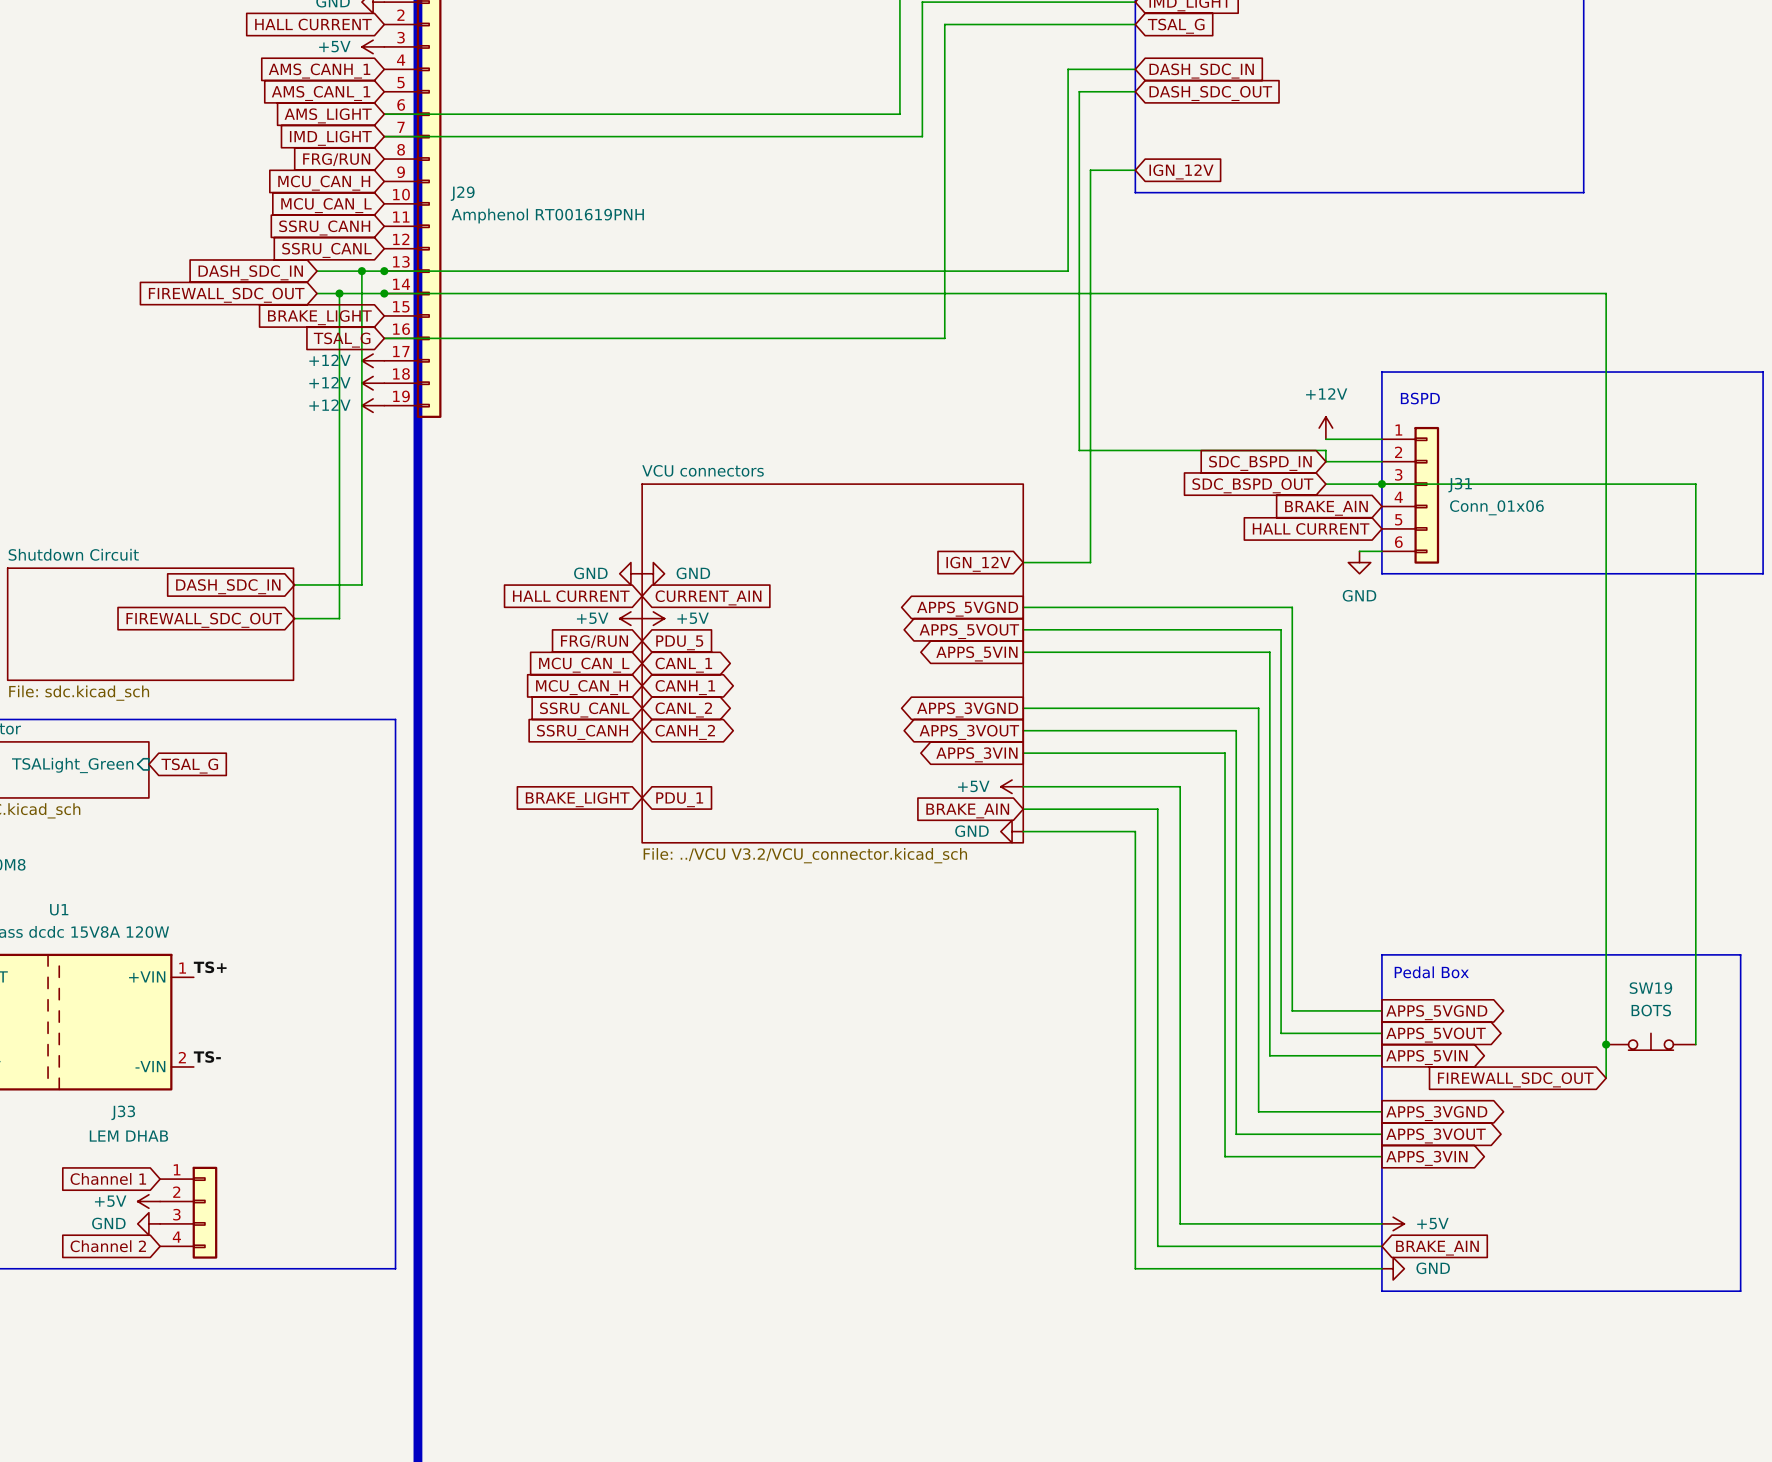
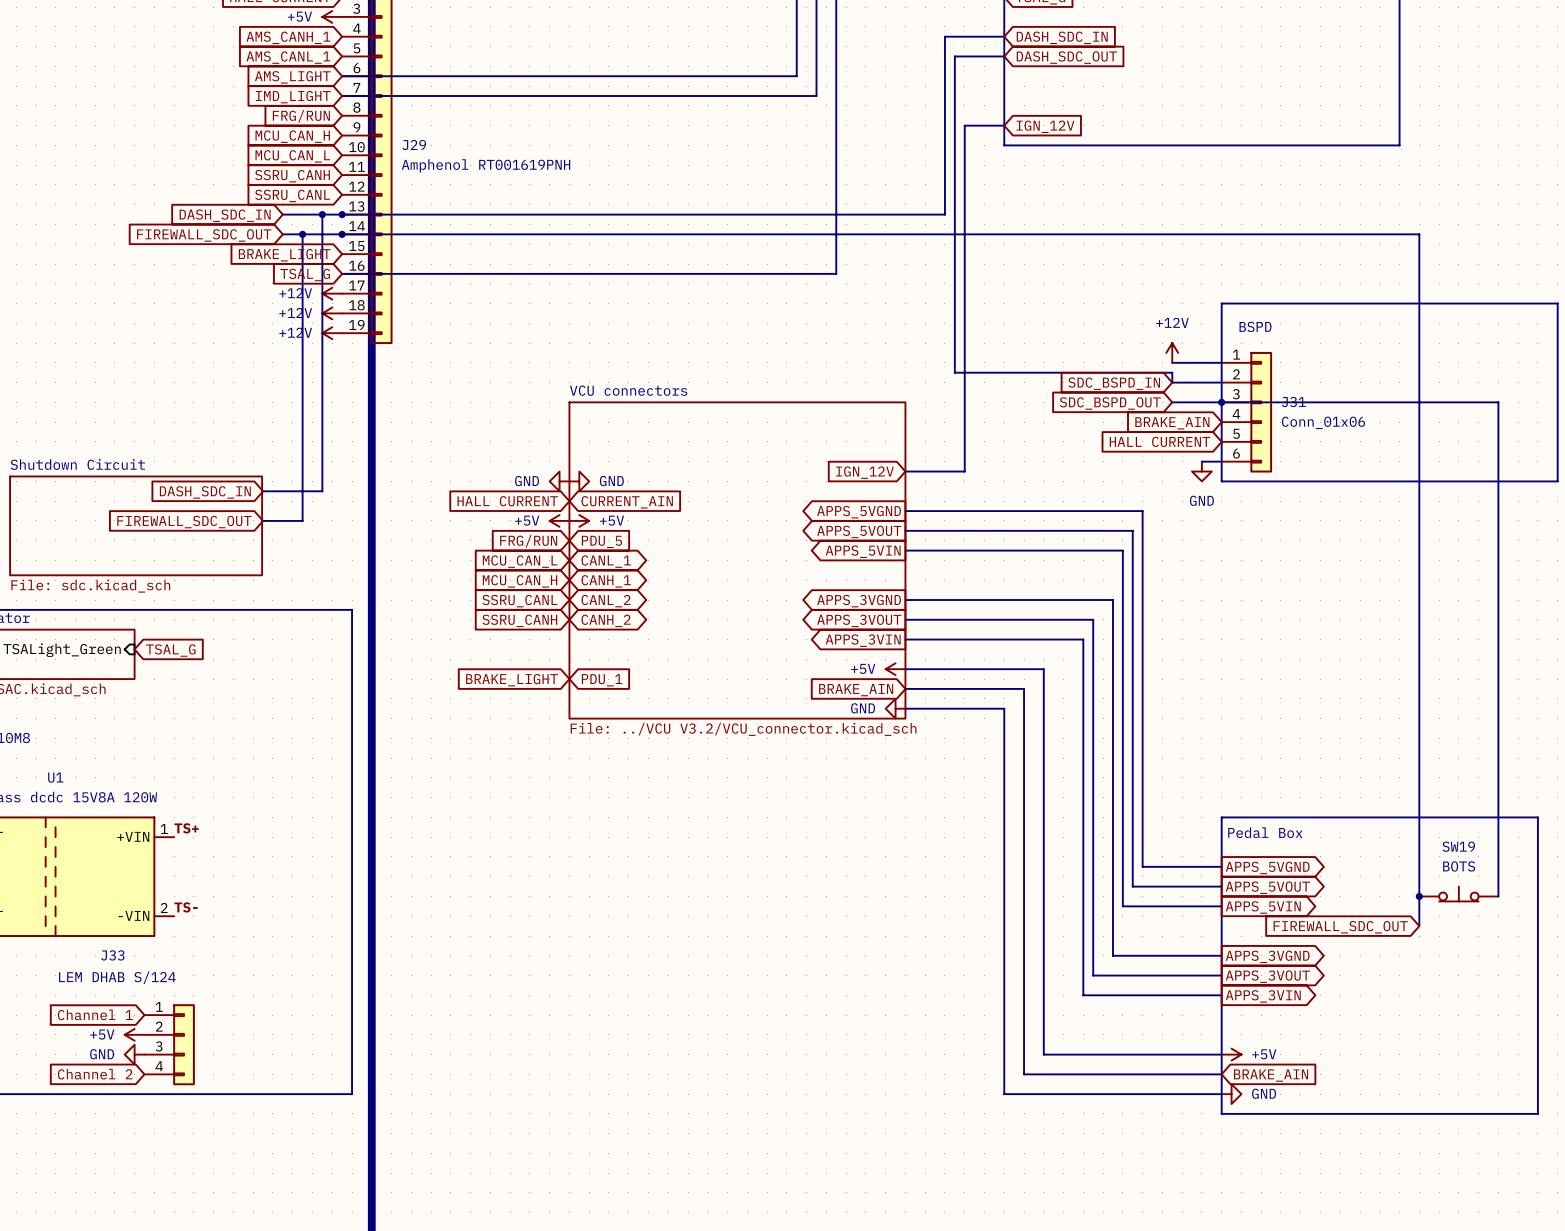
J33 value: LEM DHAB (128, 1136) -> LEM DHAB S/124 (117, 977)

